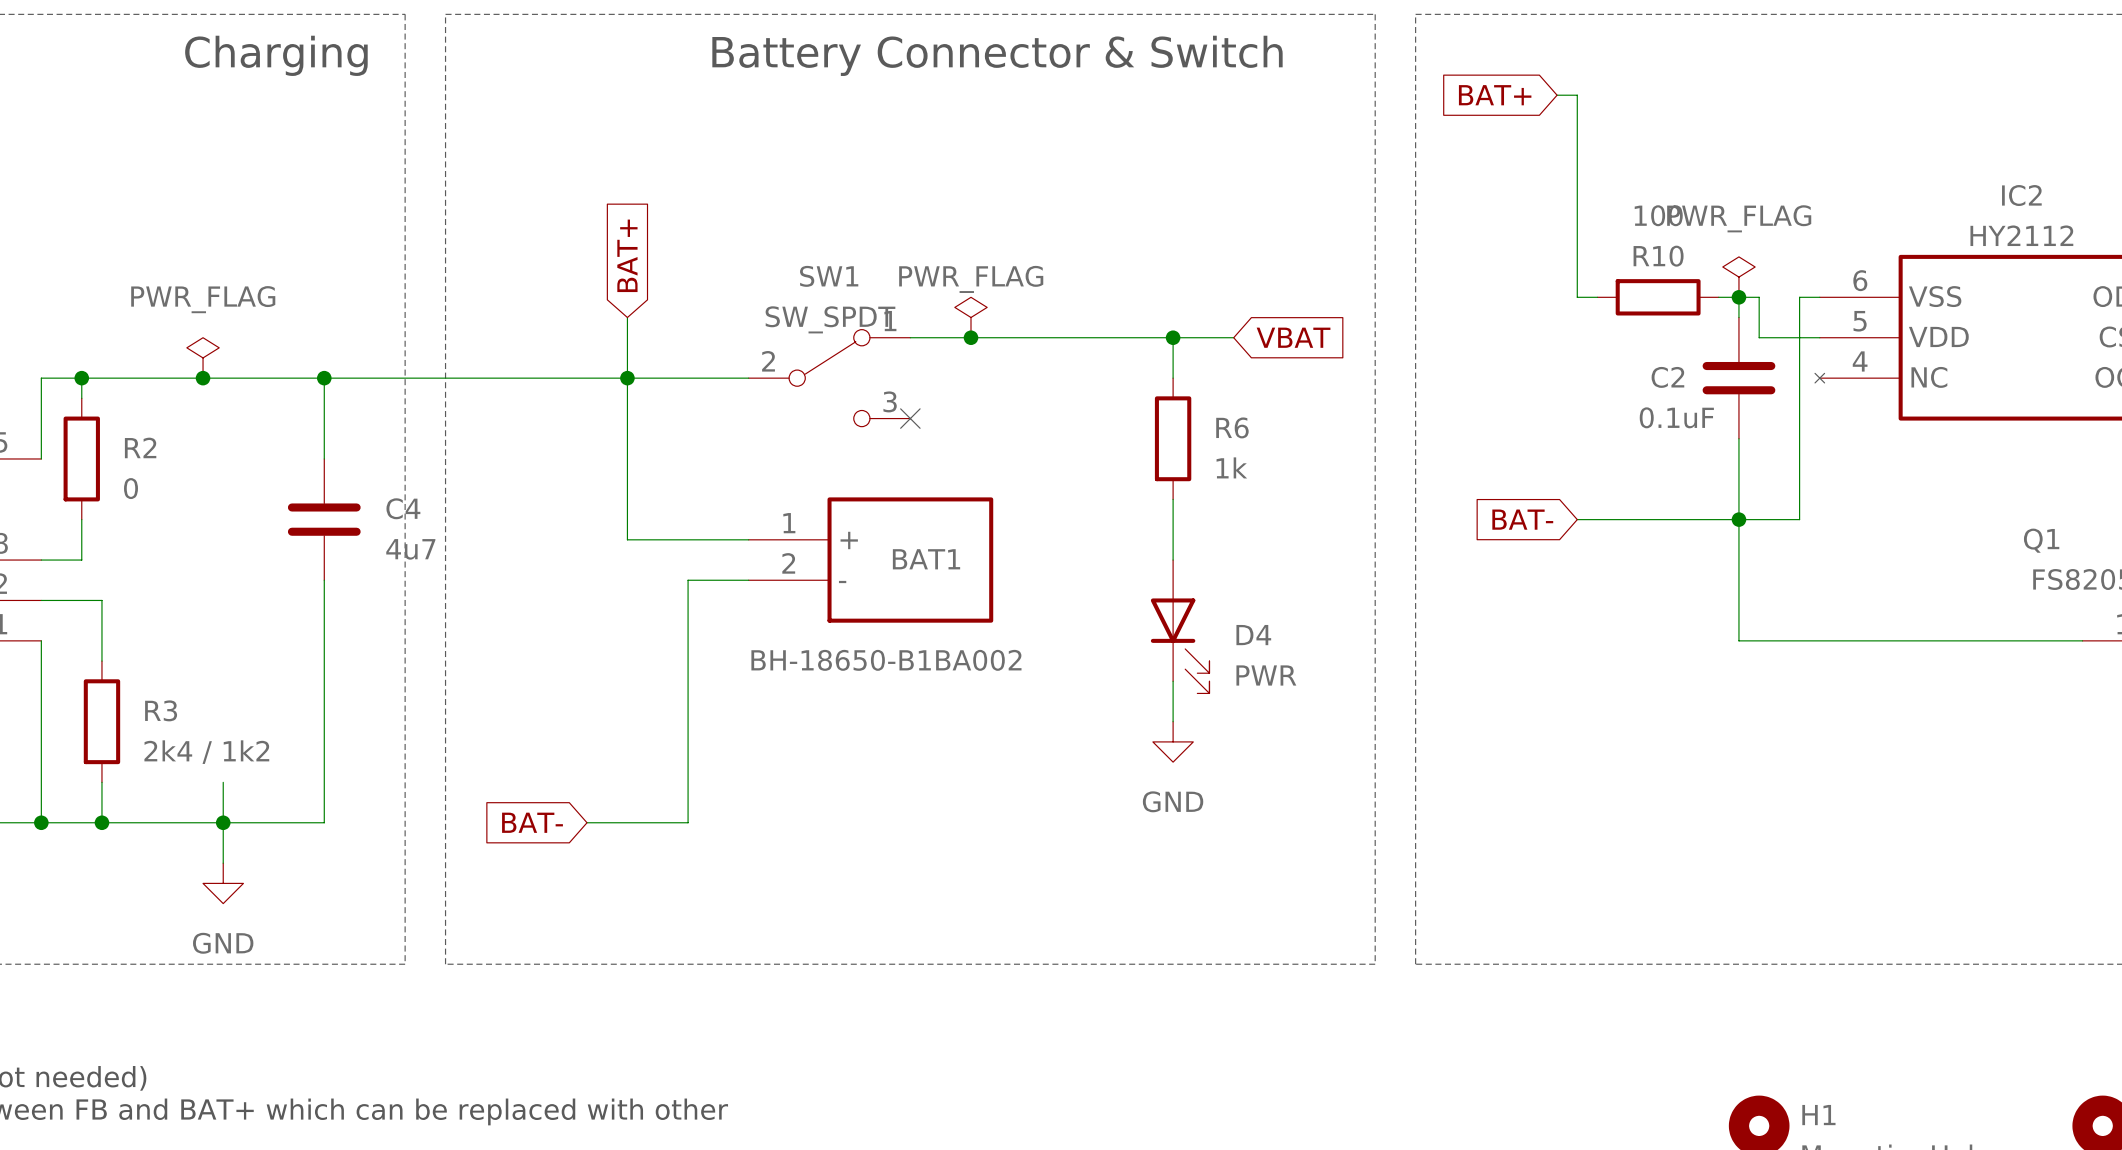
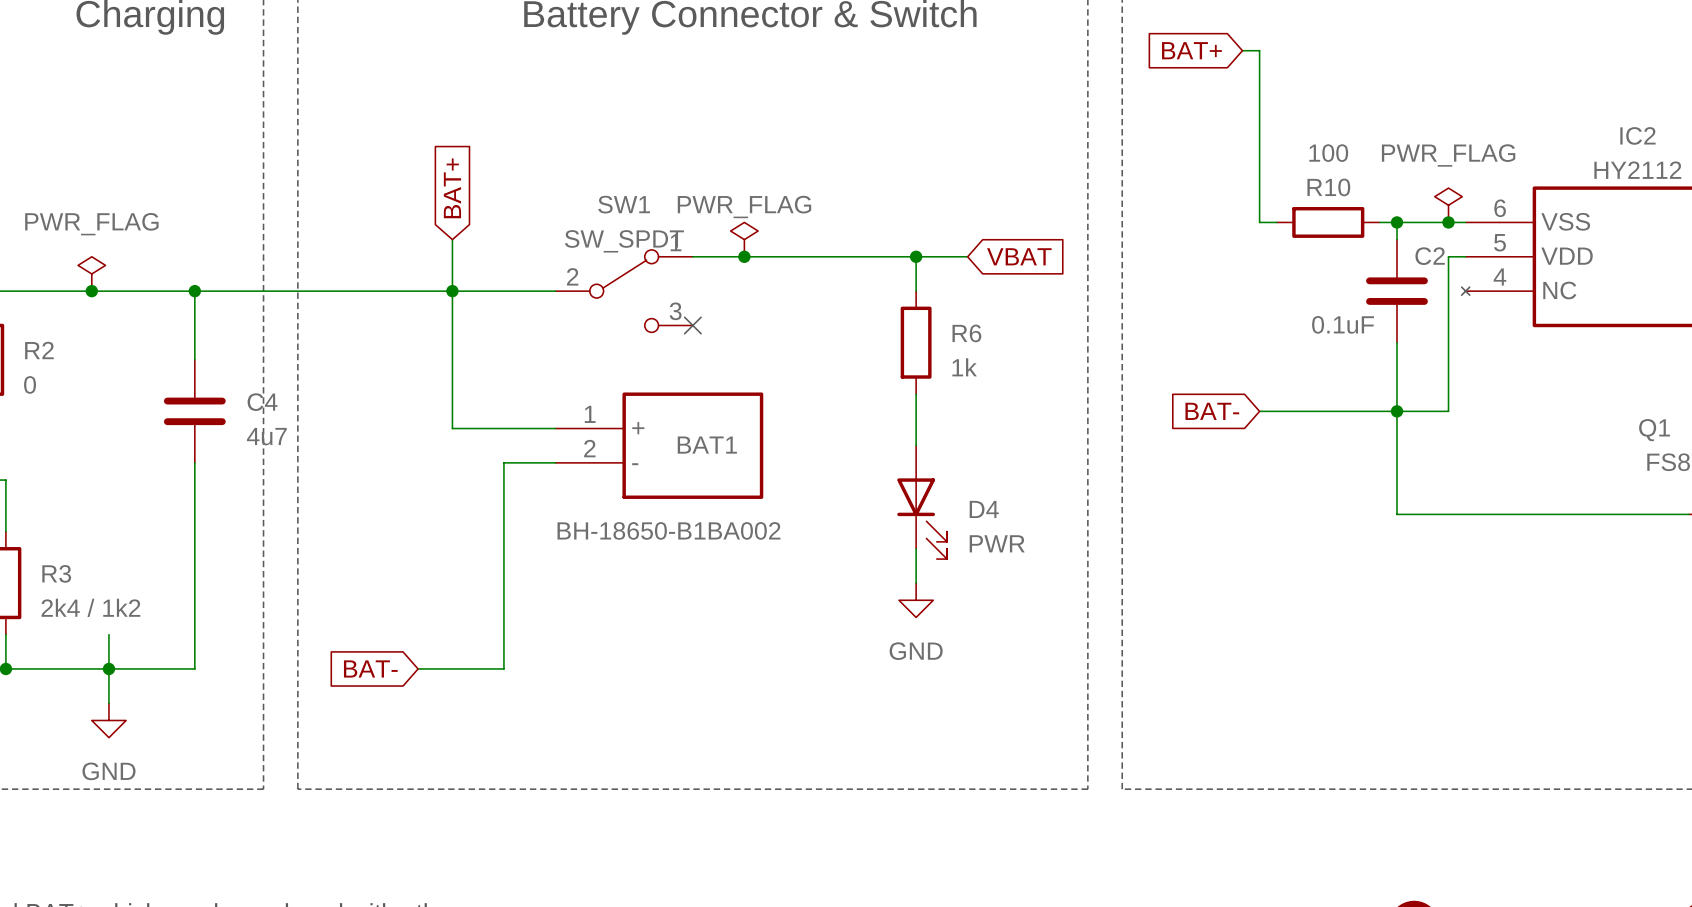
power symbol position: PWR_FLAG (1738, 277) -> PWR_FLAG (1448, 205)
wire: (1759, 297) (1759, 337) (1799, 337) (1799, 297) -> (1414, 222) (1448, 222)
junction: none -> (1448, 222)
C2 name position: C2 (1667, 377) -> C2 (1430, 256)

